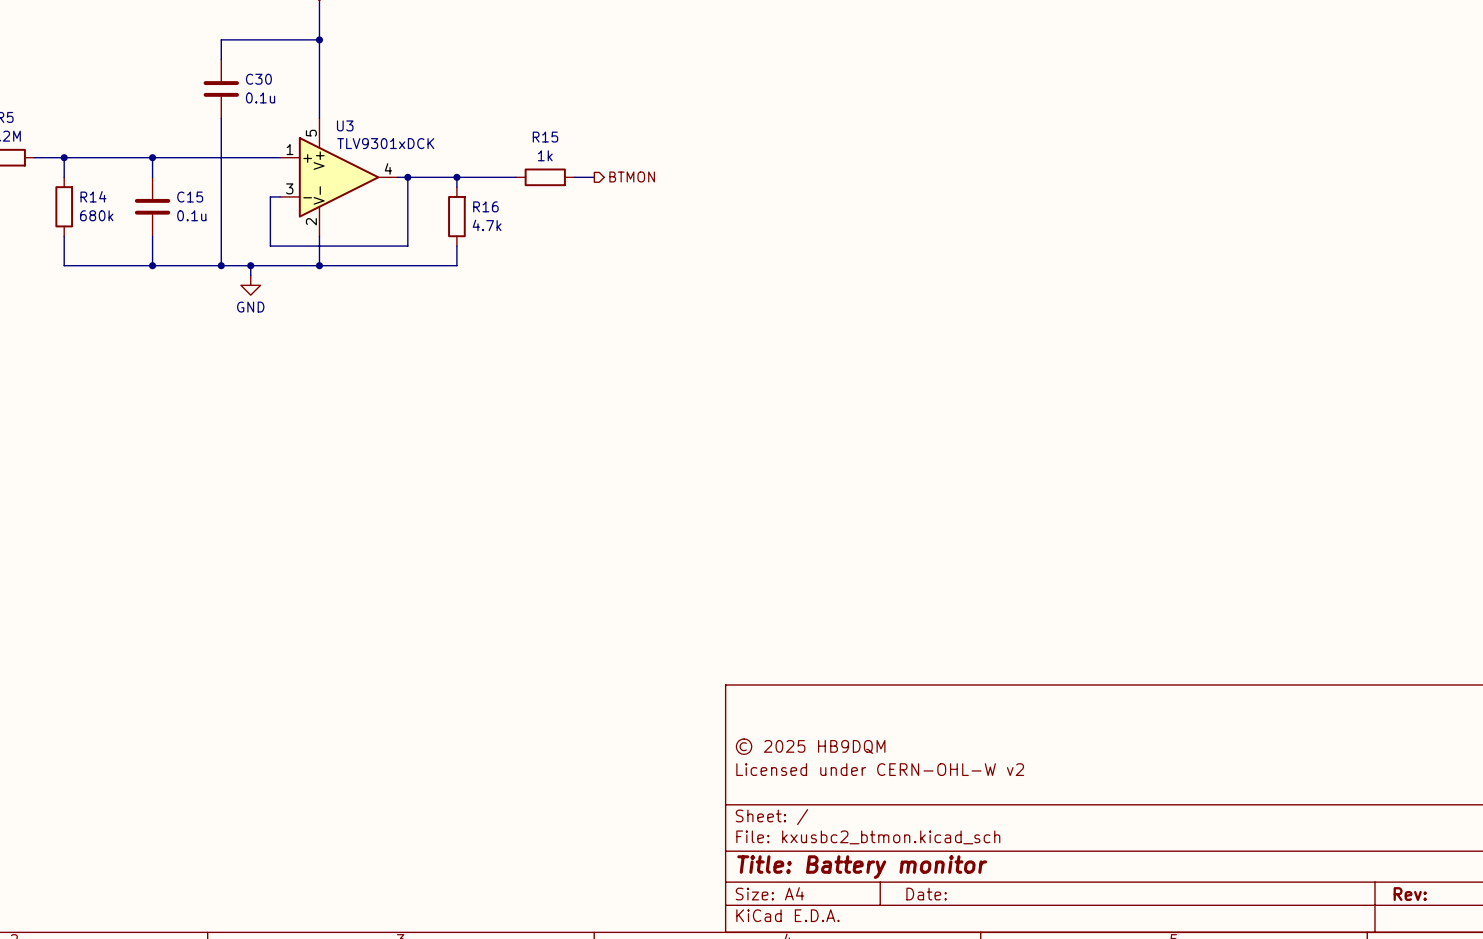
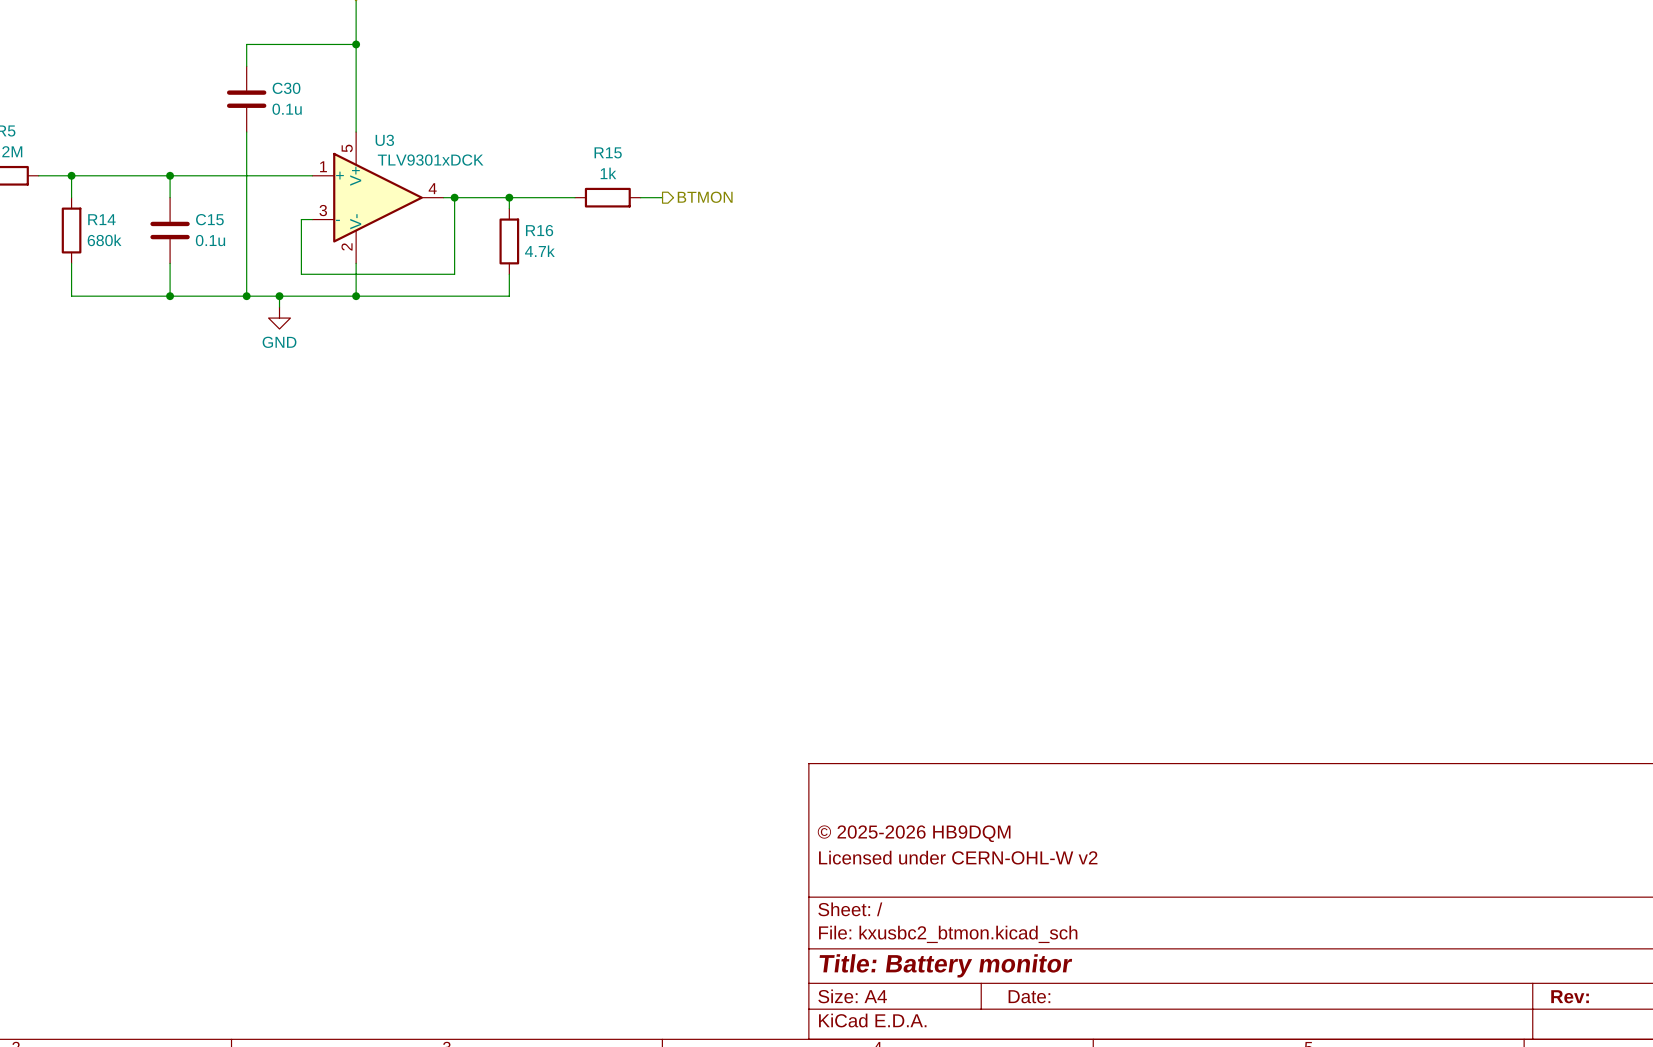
title block: © 2025 HB9DQM (810, 746) -> © 2025-2026 HB9DQM (914, 833)

